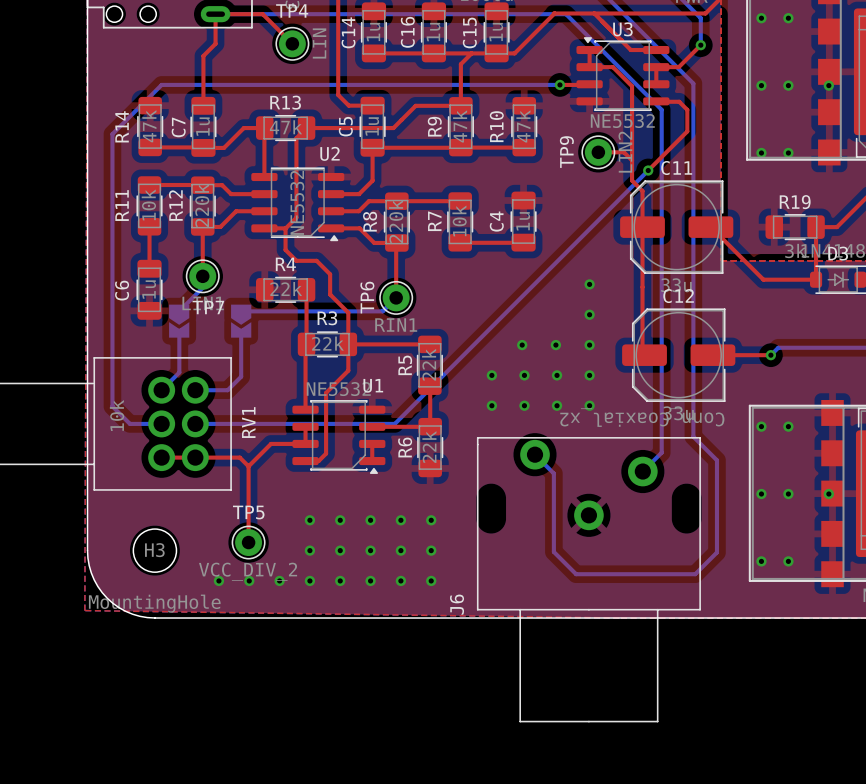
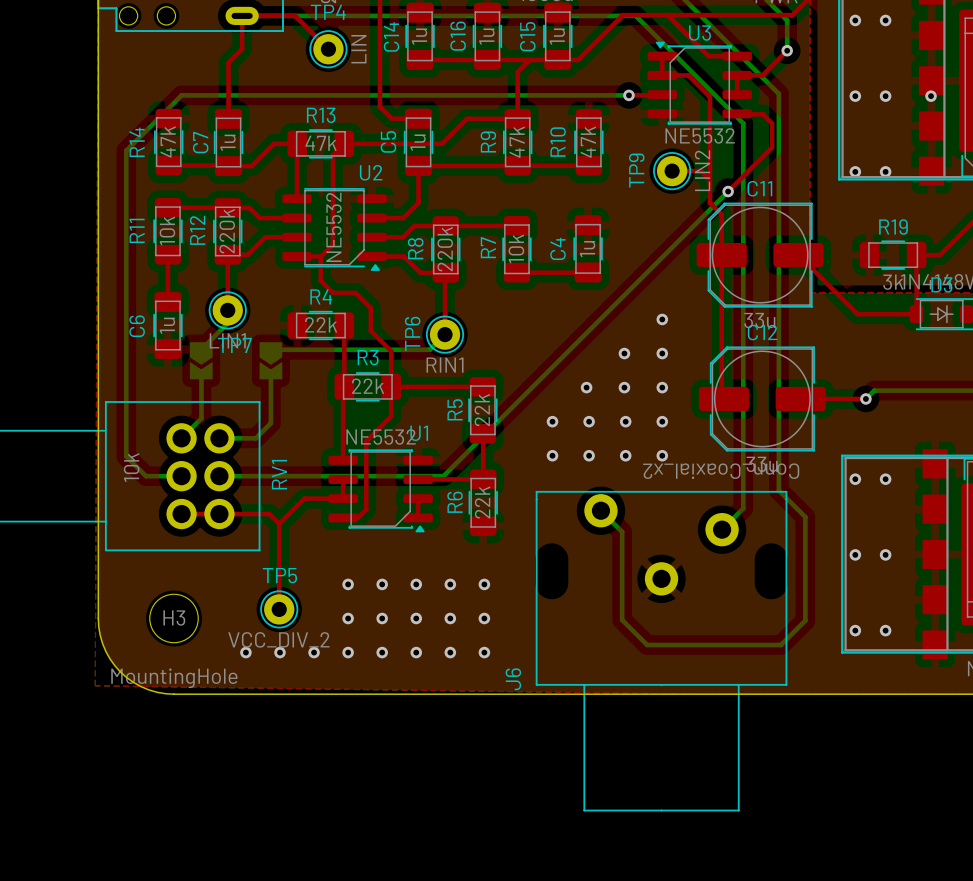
via: none -> (624, 353)
via: (828, 494) -> none

